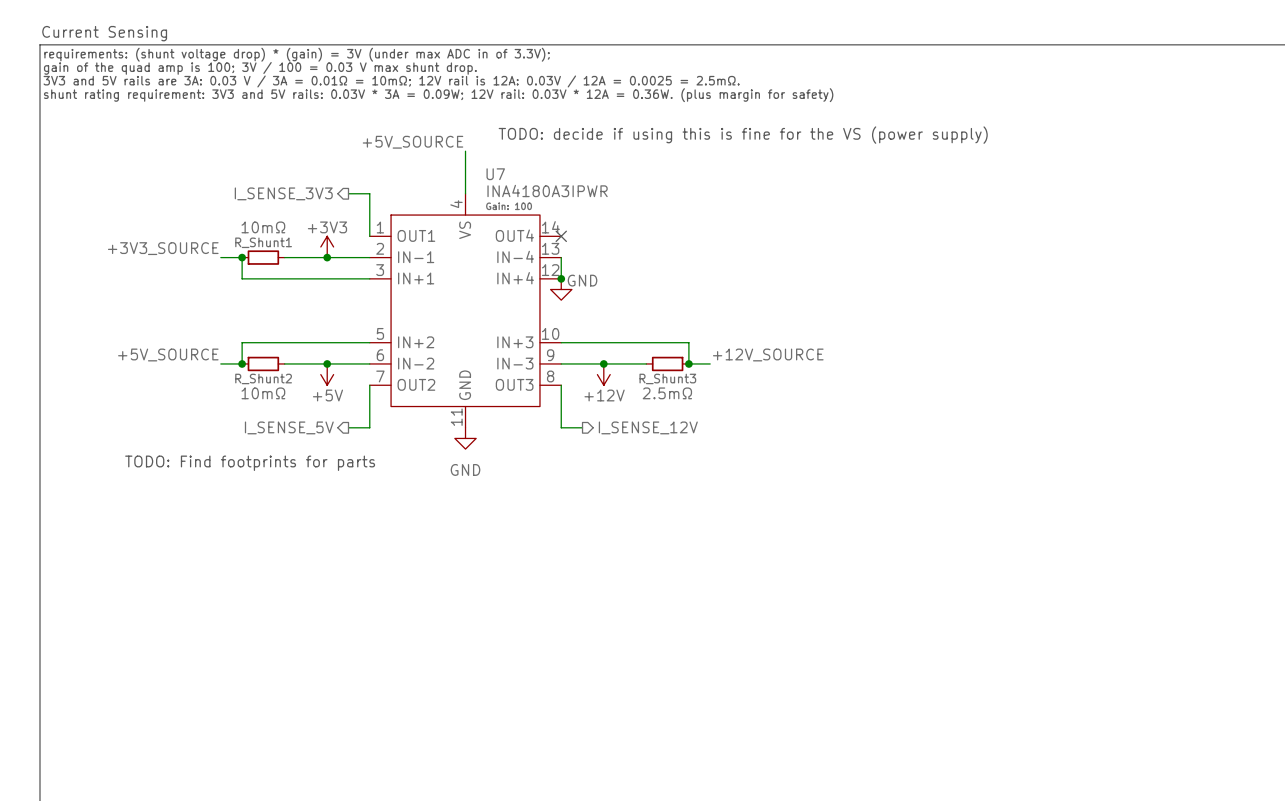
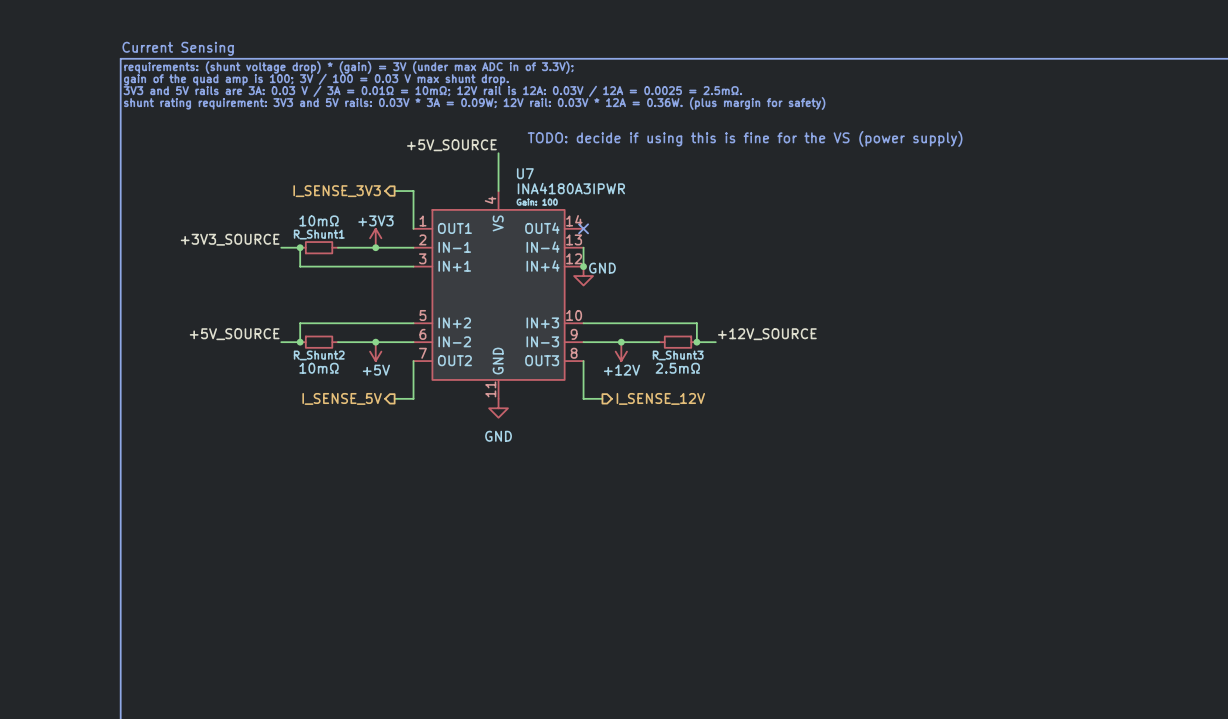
text: TODO: Find footprints for parts (250, 463) -> none

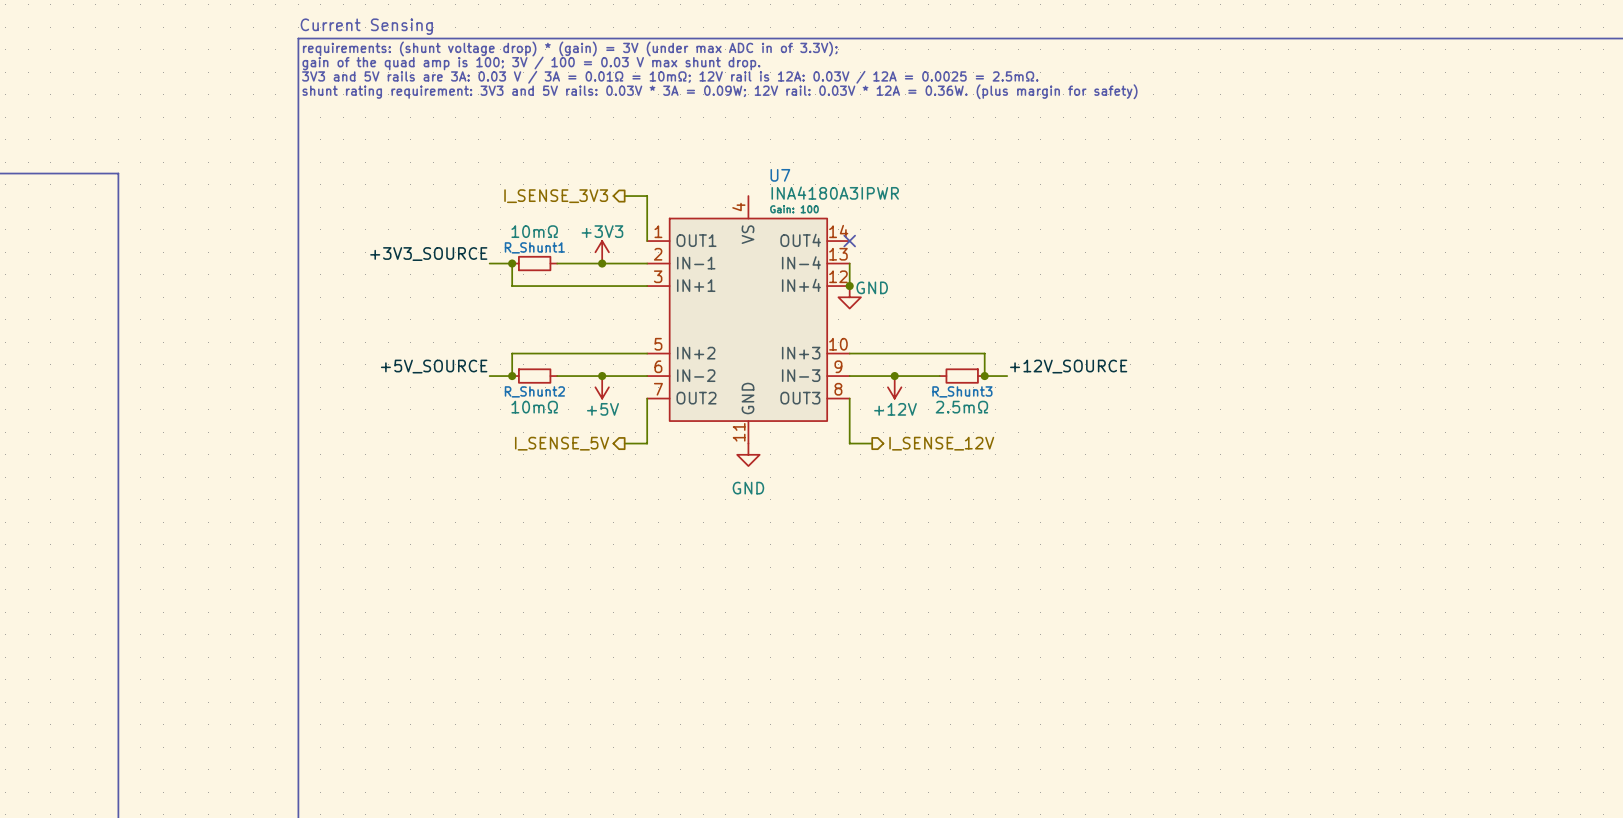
text: TODO: decide if using this is fine for the VS (power supply) (745, 138) -> none
label: +5V_SOURCE (451, 145) -> none
wire: (498, 153) (498, 191) -> none

